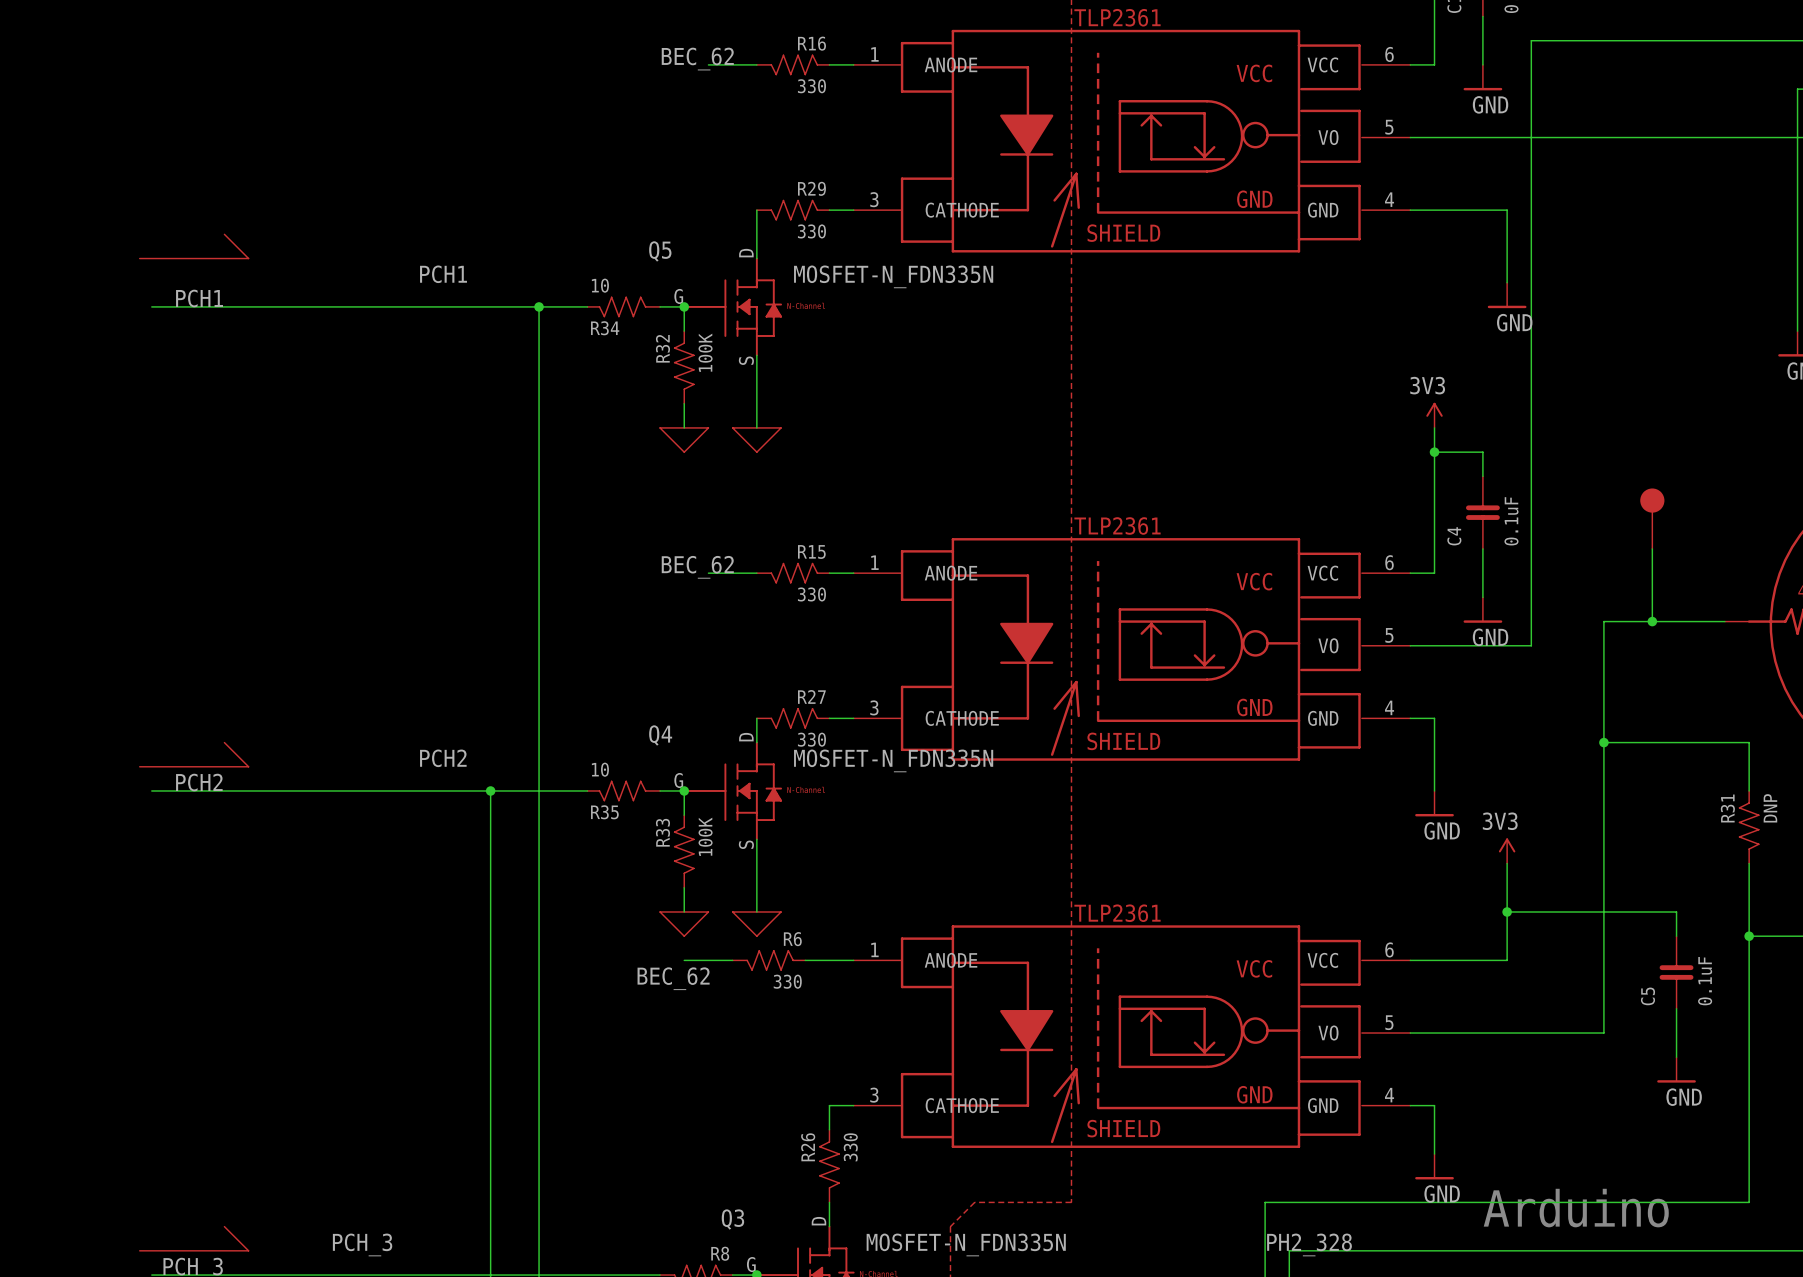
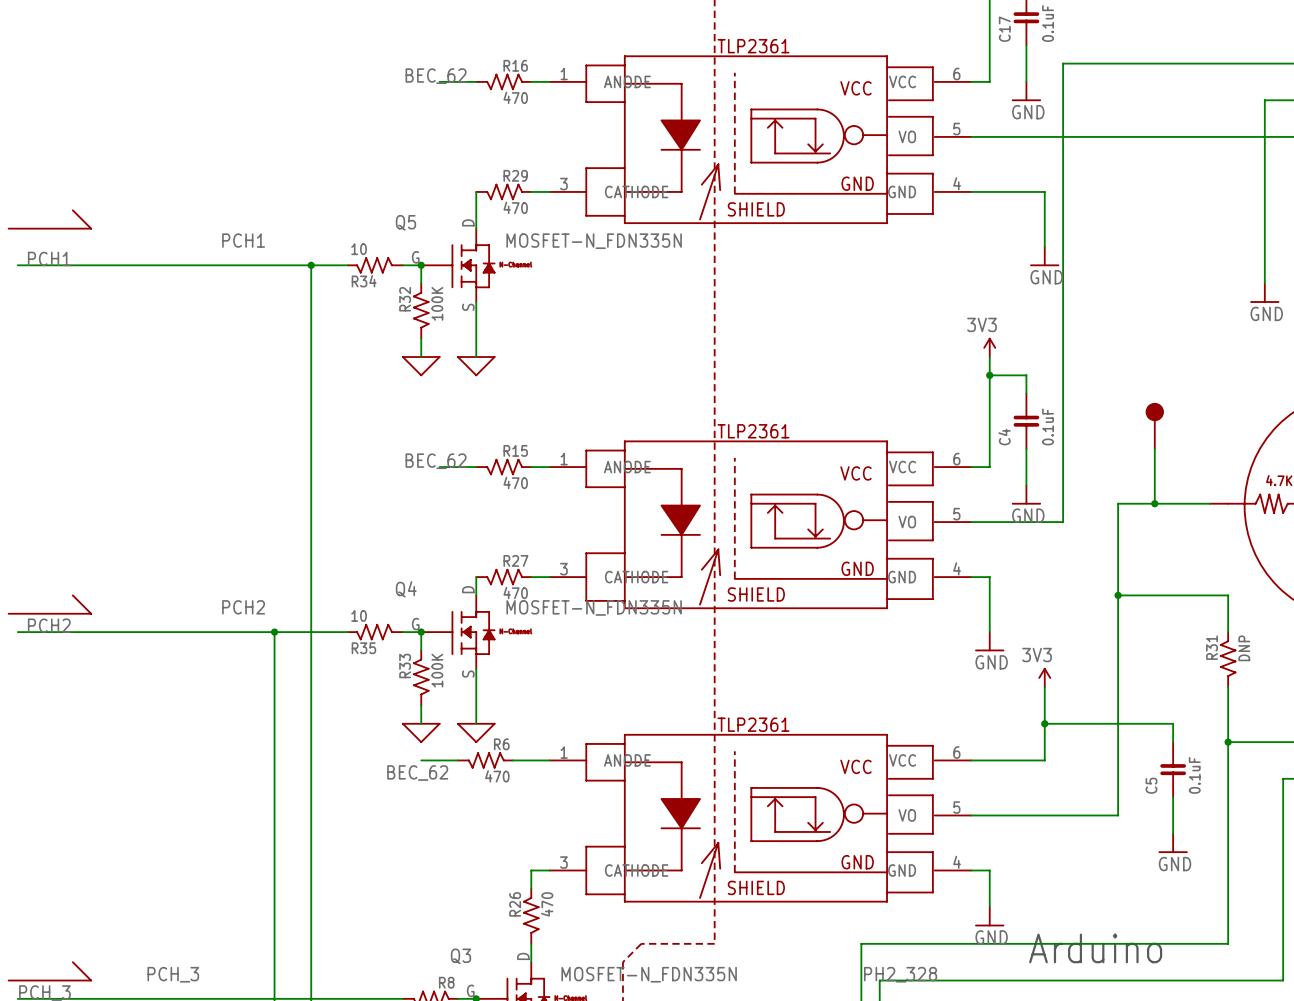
R16 value: 330 (811, 86) -> 470 (515, 97)
R29 value: 330 (811, 231) -> 470 (515, 207)
R15 value: 330 (811, 594) -> 470 (515, 482)
R27 value: 330 (811, 739) -> 470 (515, 592)
R6 value: 330 (787, 981) -> 470 (497, 776)
R26 value: 330 (850, 1147) -> 470 (547, 904)

